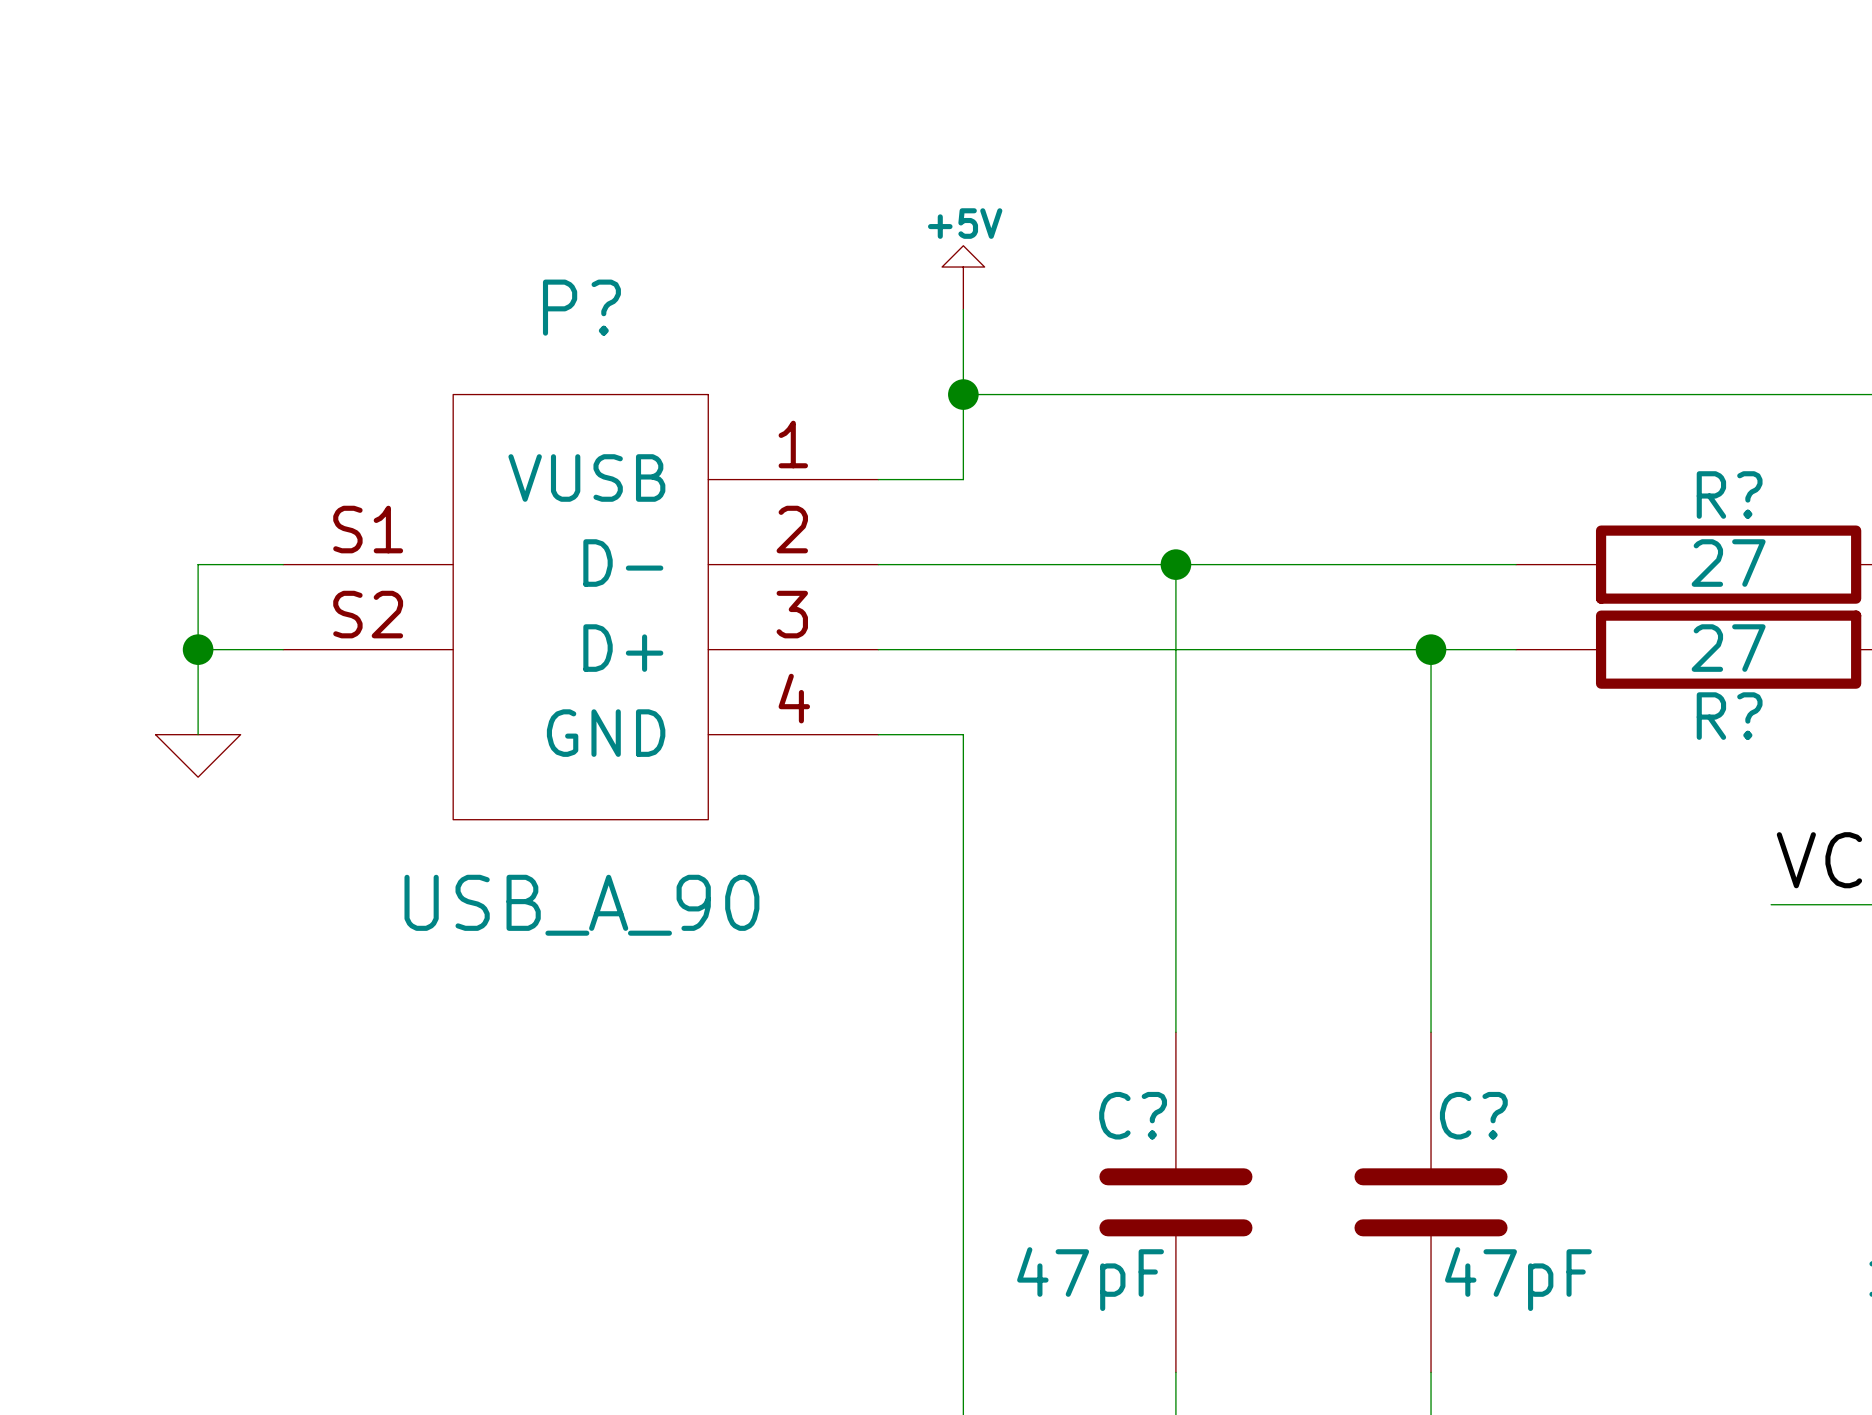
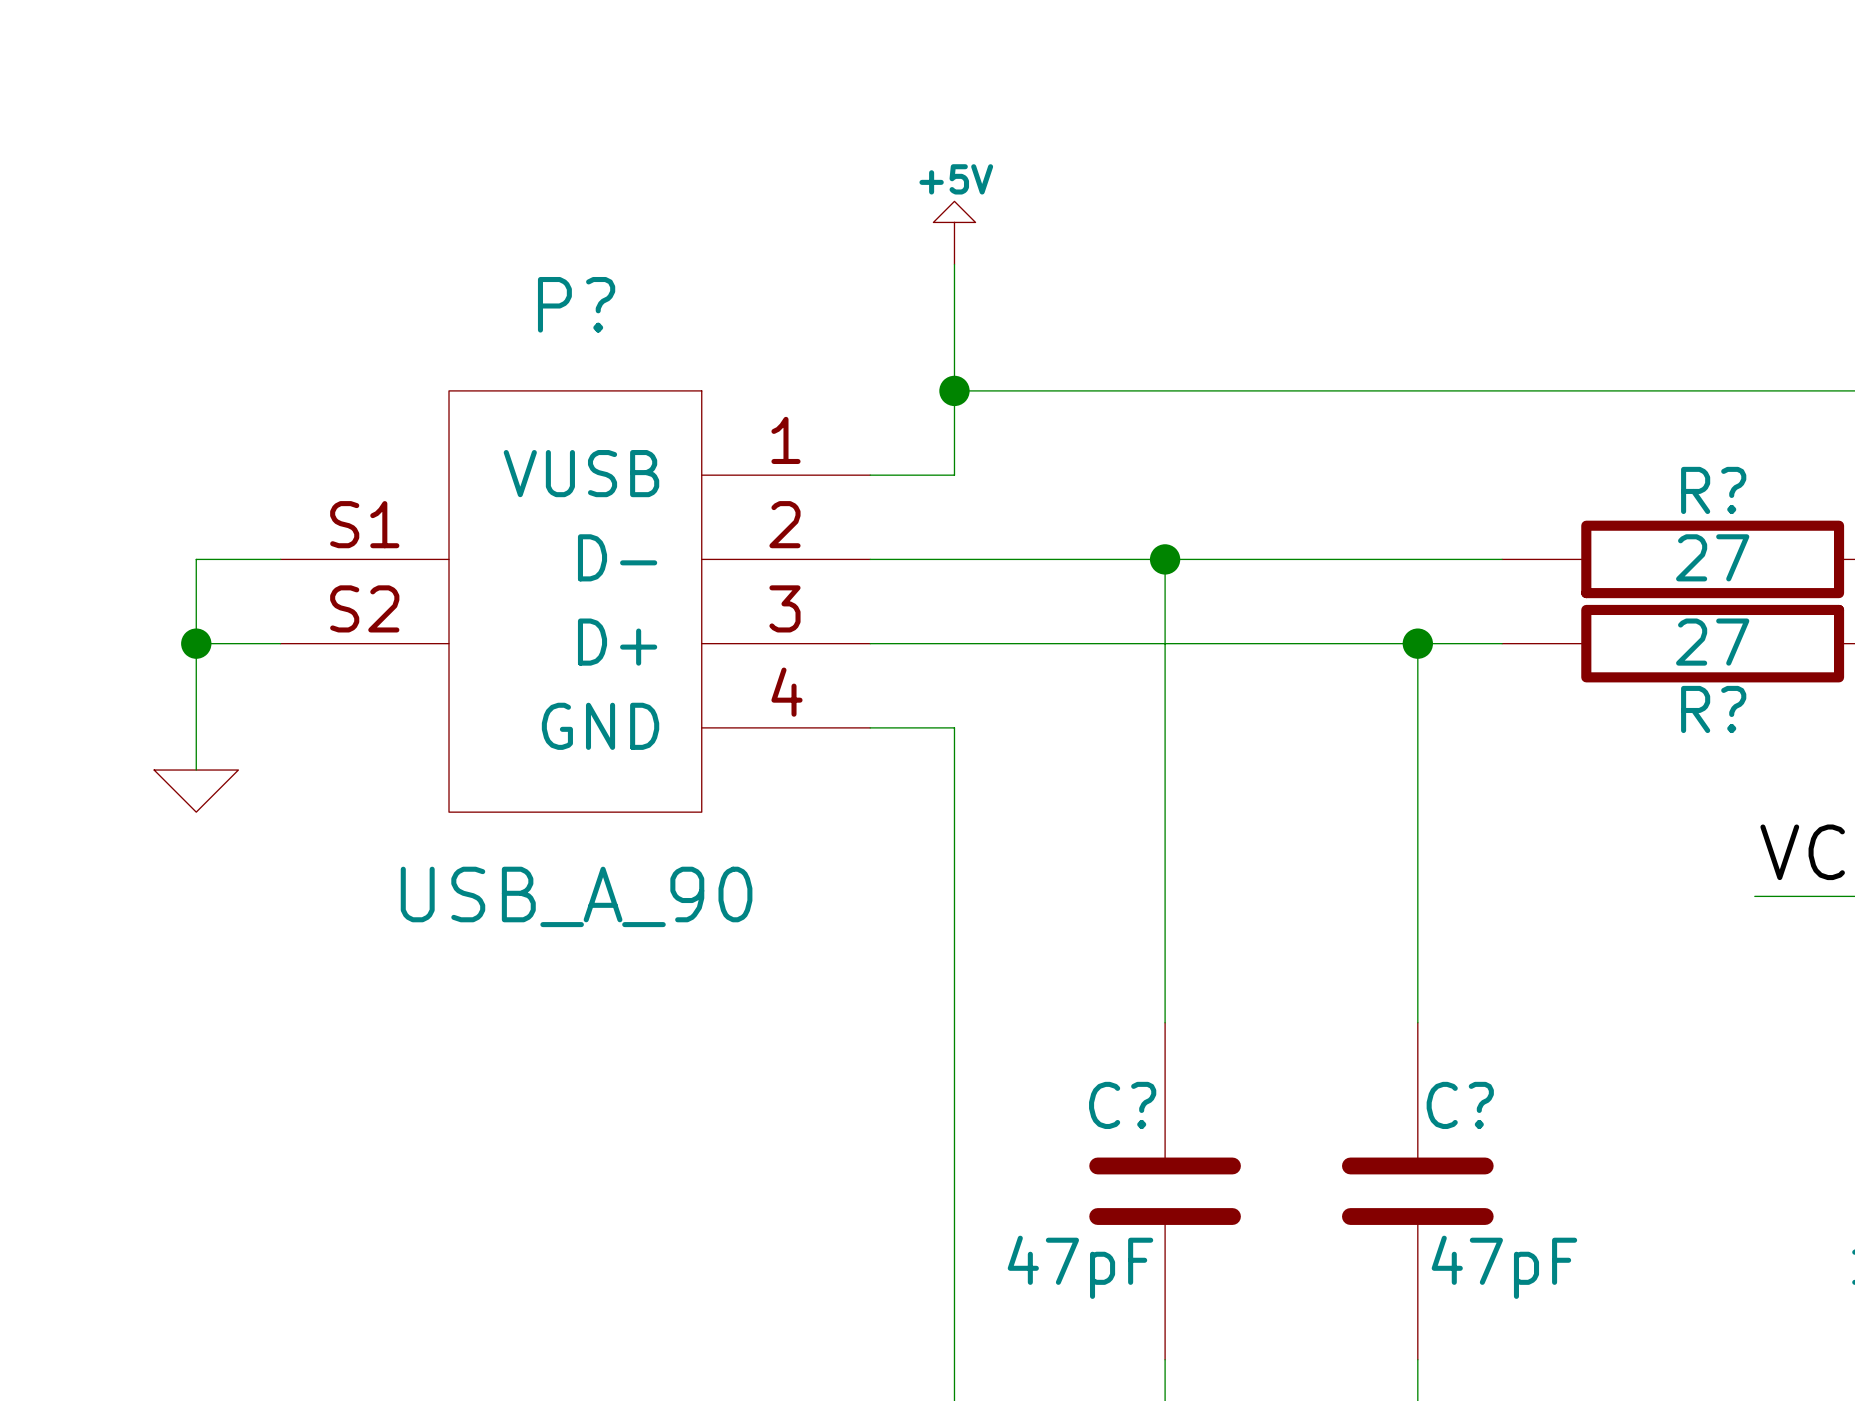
power symbol position: +5V (963, 277) -> +5V (954, 232)
wire: none -> (196, 727) (196, 770)
power symbol position: (198, 755) -> (196, 791)

